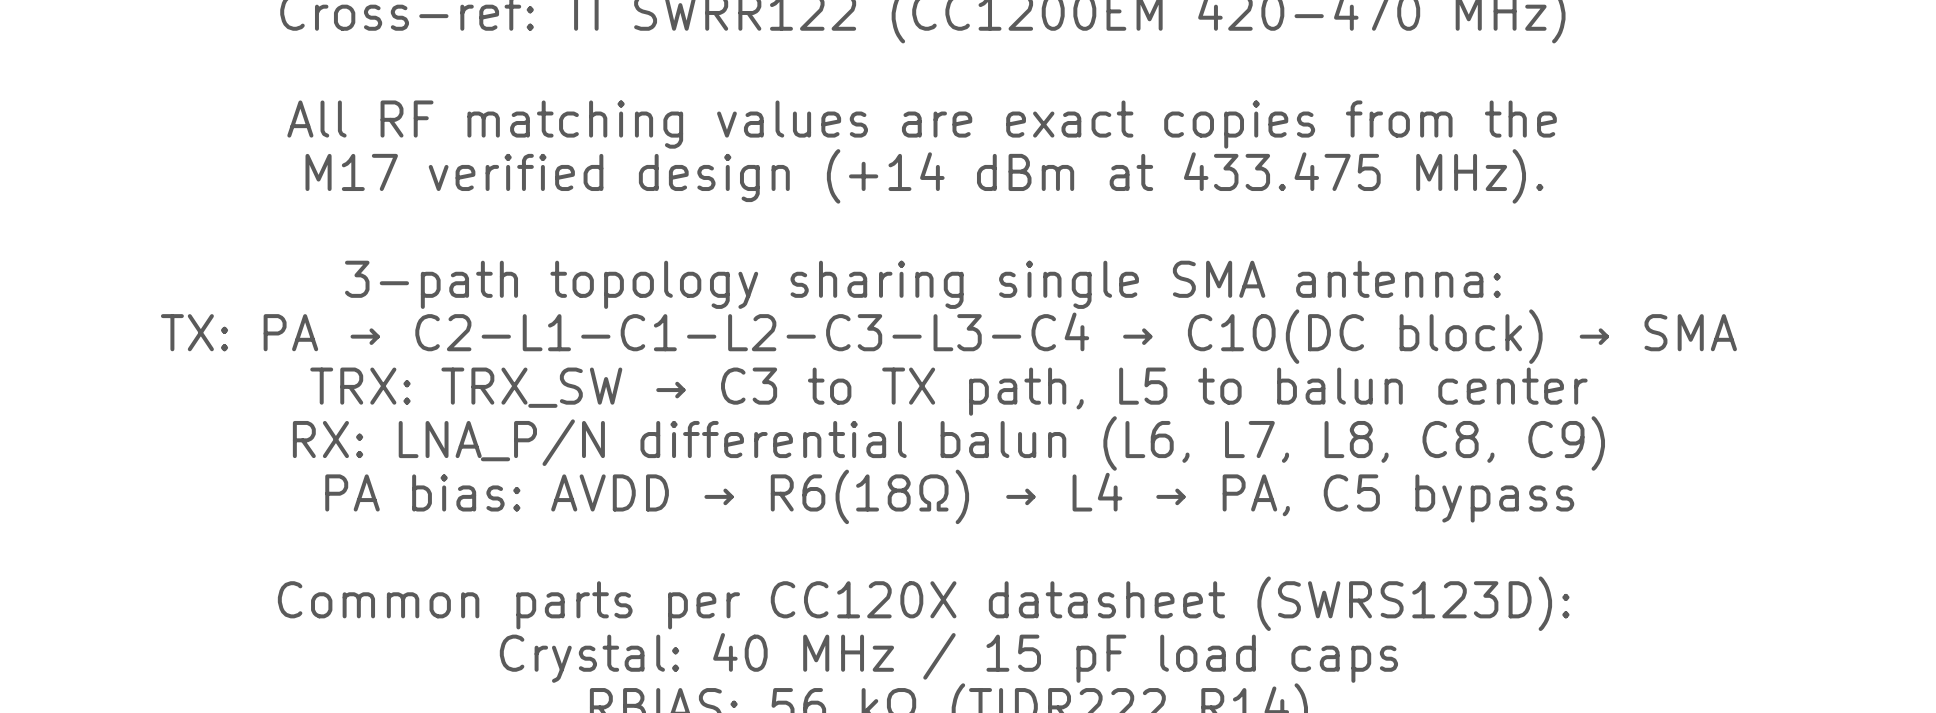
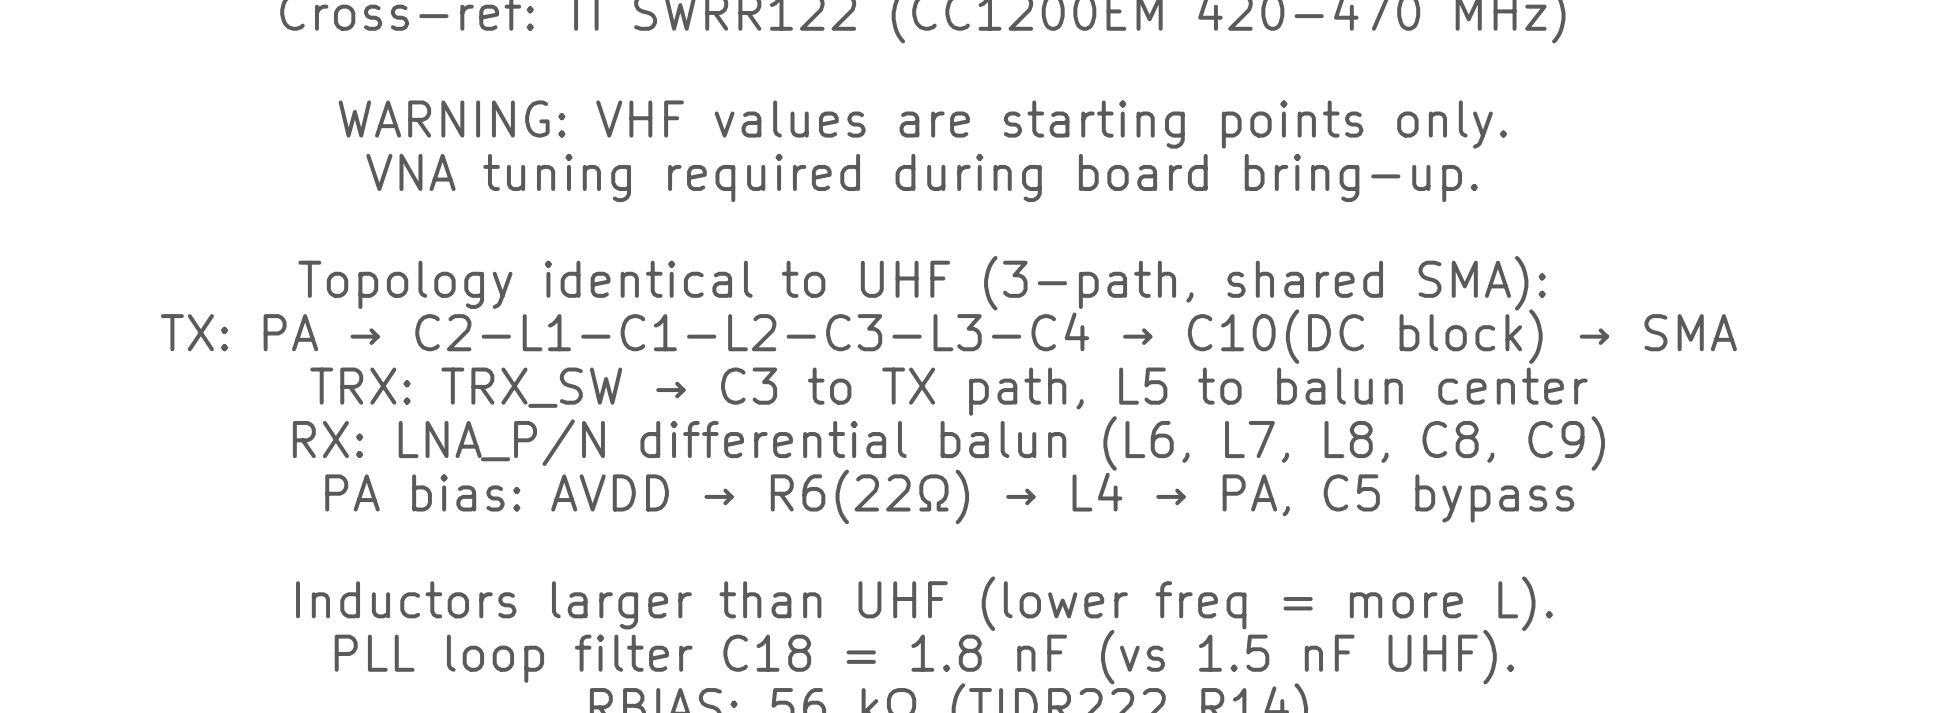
text: All RF matching values are exact copies from the (922, 124) -> WARNING: VHF values are starting points only. (922, 124)
text: M17 verified design (+14 dBm at 433.475 MHz). (924, 176) -> VNA tuning required during board bring-up. (922, 177)
text: 3-path topology sharing single SMA antenna: (922, 284) -> Topology identical to UHF (3-path, shared SMA): (922, 283)
text: PA bias: AVDD → R6(18Ω) → L4 → PA, C5 bypass (949, 496) -> PA bias: AVDD → R6(22Ω) → L4 → PA, C5 bypass (949, 496)
text: Common parts per CC120X datasheet (SWRS123D): (923, 603) -> Inductors larger than UHF (lower freq = more L). (924, 603)
text: Crystal: 40 MHz / 15 pF load caps (948, 657) -> PLL loop filter C18 = 1.8 nF (vs 1.5 nF UHF). (924, 657)

